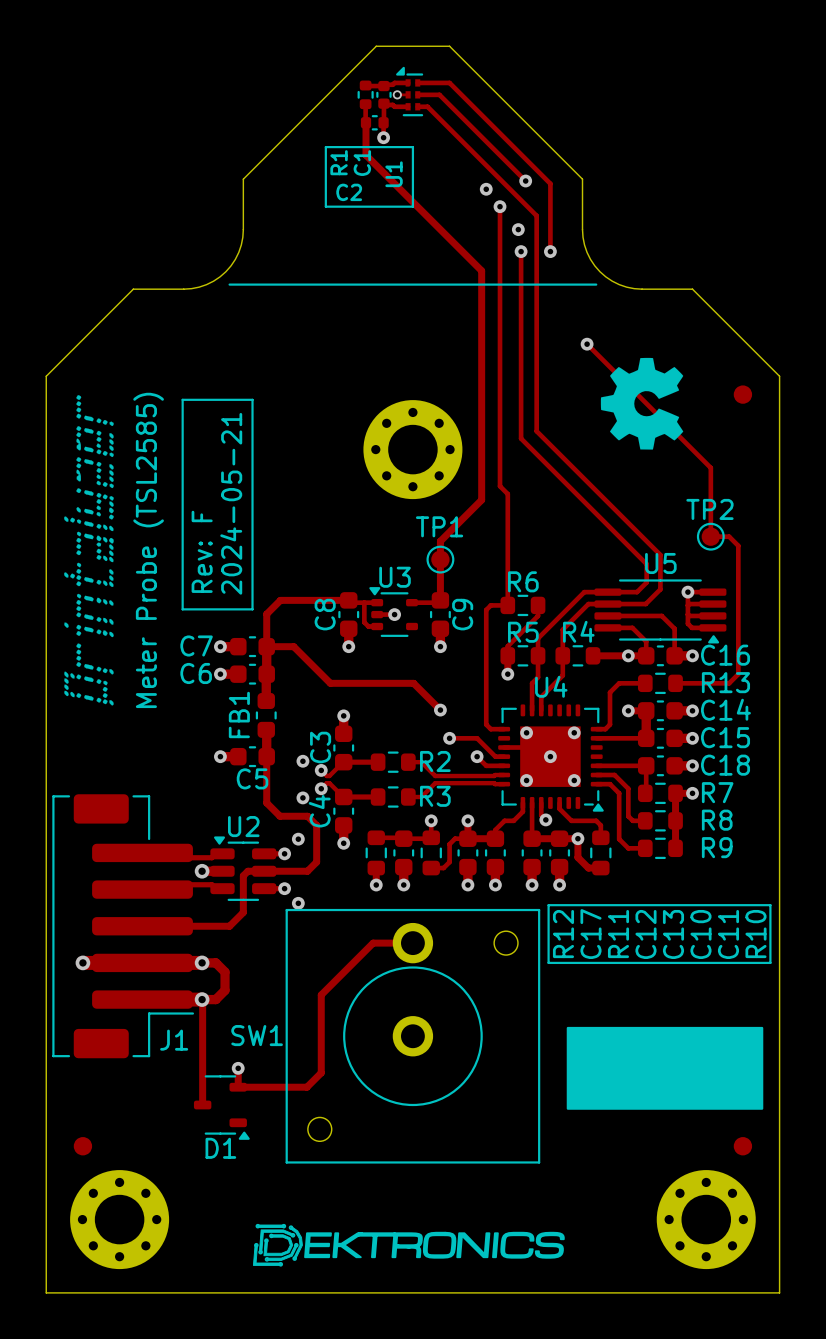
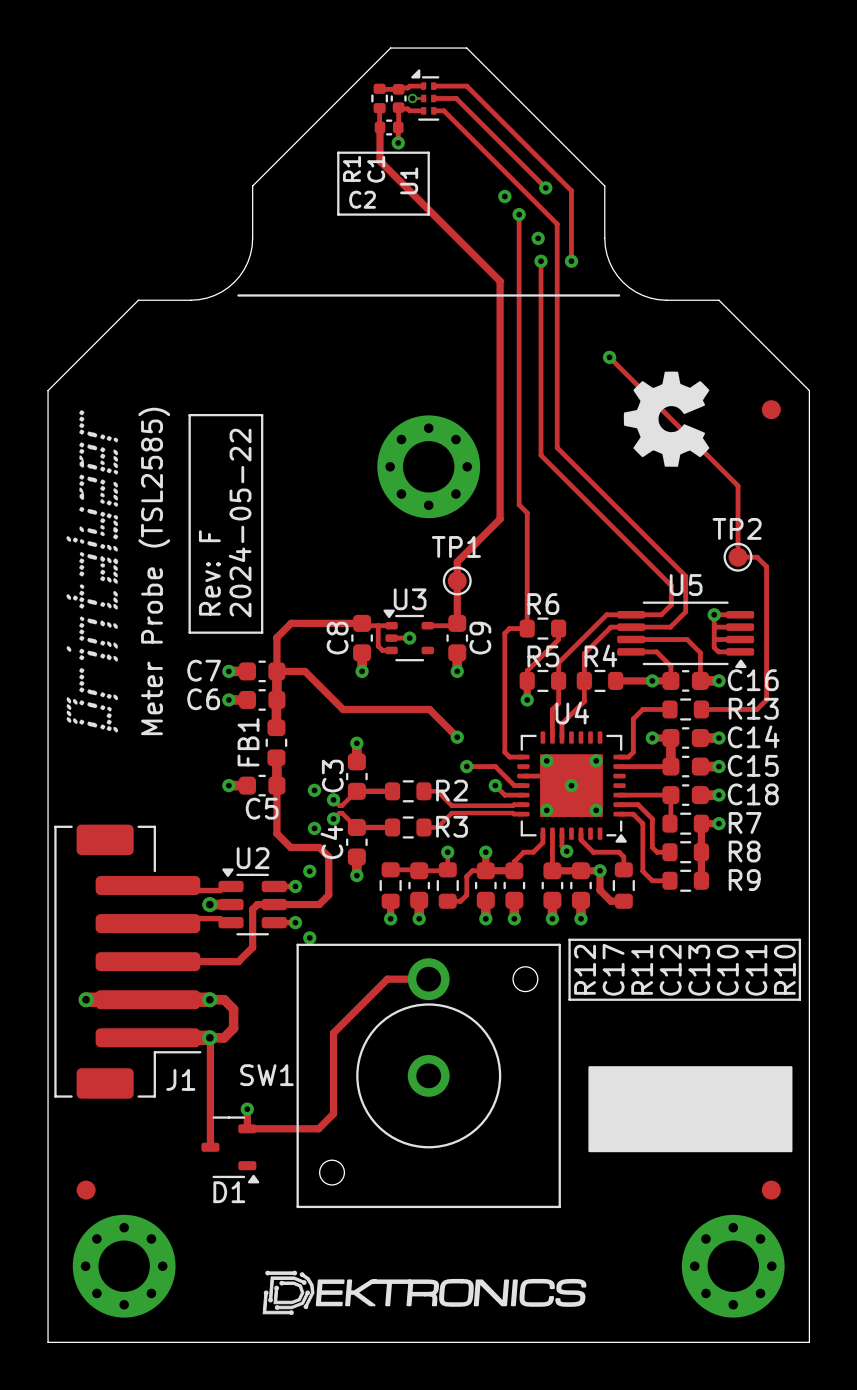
text: 2024-05-21 (231, 503) -> 2024-05-22 (240, 523)

